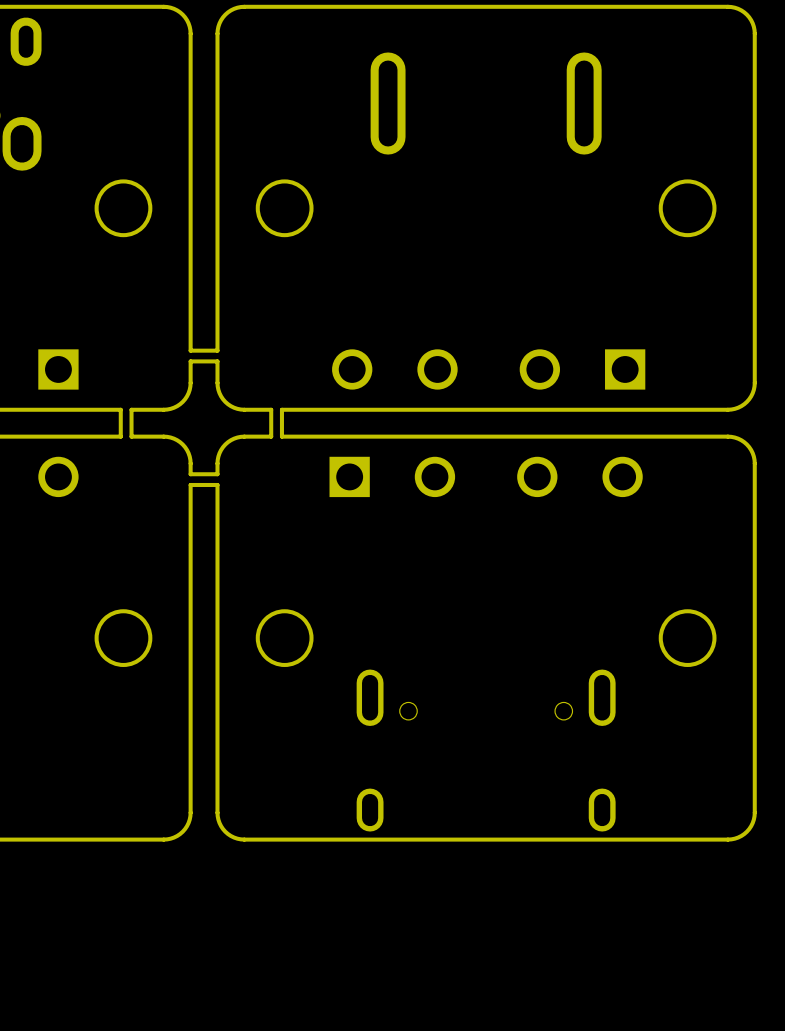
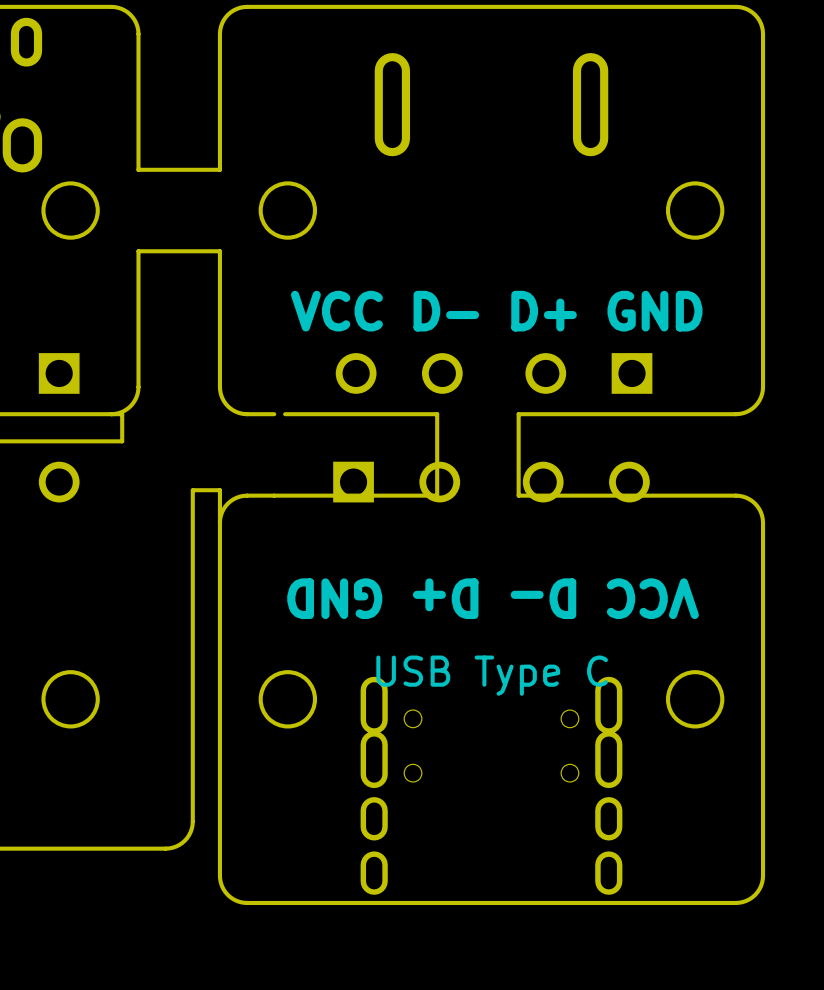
board edge: (110, 6) (170, 7) (182, 14) (189, 26) (190, 350) (217, 350) -> (111, 6) (127, 12) (134, 20) (138, 30) (138, 169) (219, 169)
board edge: (217, 167) (217, 248) -> (111, 414) (127, 408) (134, 400) (138, 390) (138, 251) (219, 251)
round board edge position: (123, 208) -> (70, 210)
text: none -> VCC D- D+ GND (496, 311)
board edge: (217, 361) (190, 361) (189, 389) (185, 399) (177, 406) (167, 409) (131, 409) (131, 436) (163, 436) (174, 438) (182, 444) (188, 453) (190, 474) (217, 474) (218, 456) (228, 442) (240, 436) (271, 436) (271, 409) -> (219, 365) (219, 354)
board edge: (281, 409) (281, 436) (734, 437) (746, 444) (753, 456) (754, 517) -> (518, 414) (518, 495) (739, 495) (749, 499) (757, 506) (763, 522)
board edge: (512, 409) (432, 409) -> (219, 522) (225, 506) (233, 499) (243, 495) (437, 495) (437, 414)
text: none -> VCC D- D+ GND (493, 598)
round board edge position: (123, 638) -> (70, 699)
round board edge position: (284, 638) -> (287, 699)
round board edge position: (687, 638) -> (695, 699)
part: none -> USB Type C (491, 812)
board edge: (754, 812) (752, 823) (746, 831) (738, 837) (727, 839) (244, 839) (234, 837) (225, 831) (219, 823) (217, 812) -> (763, 821) (762, 882) (752, 897) (735, 902) (243, 902) (230, 897) (220, 882) (219, 821)

